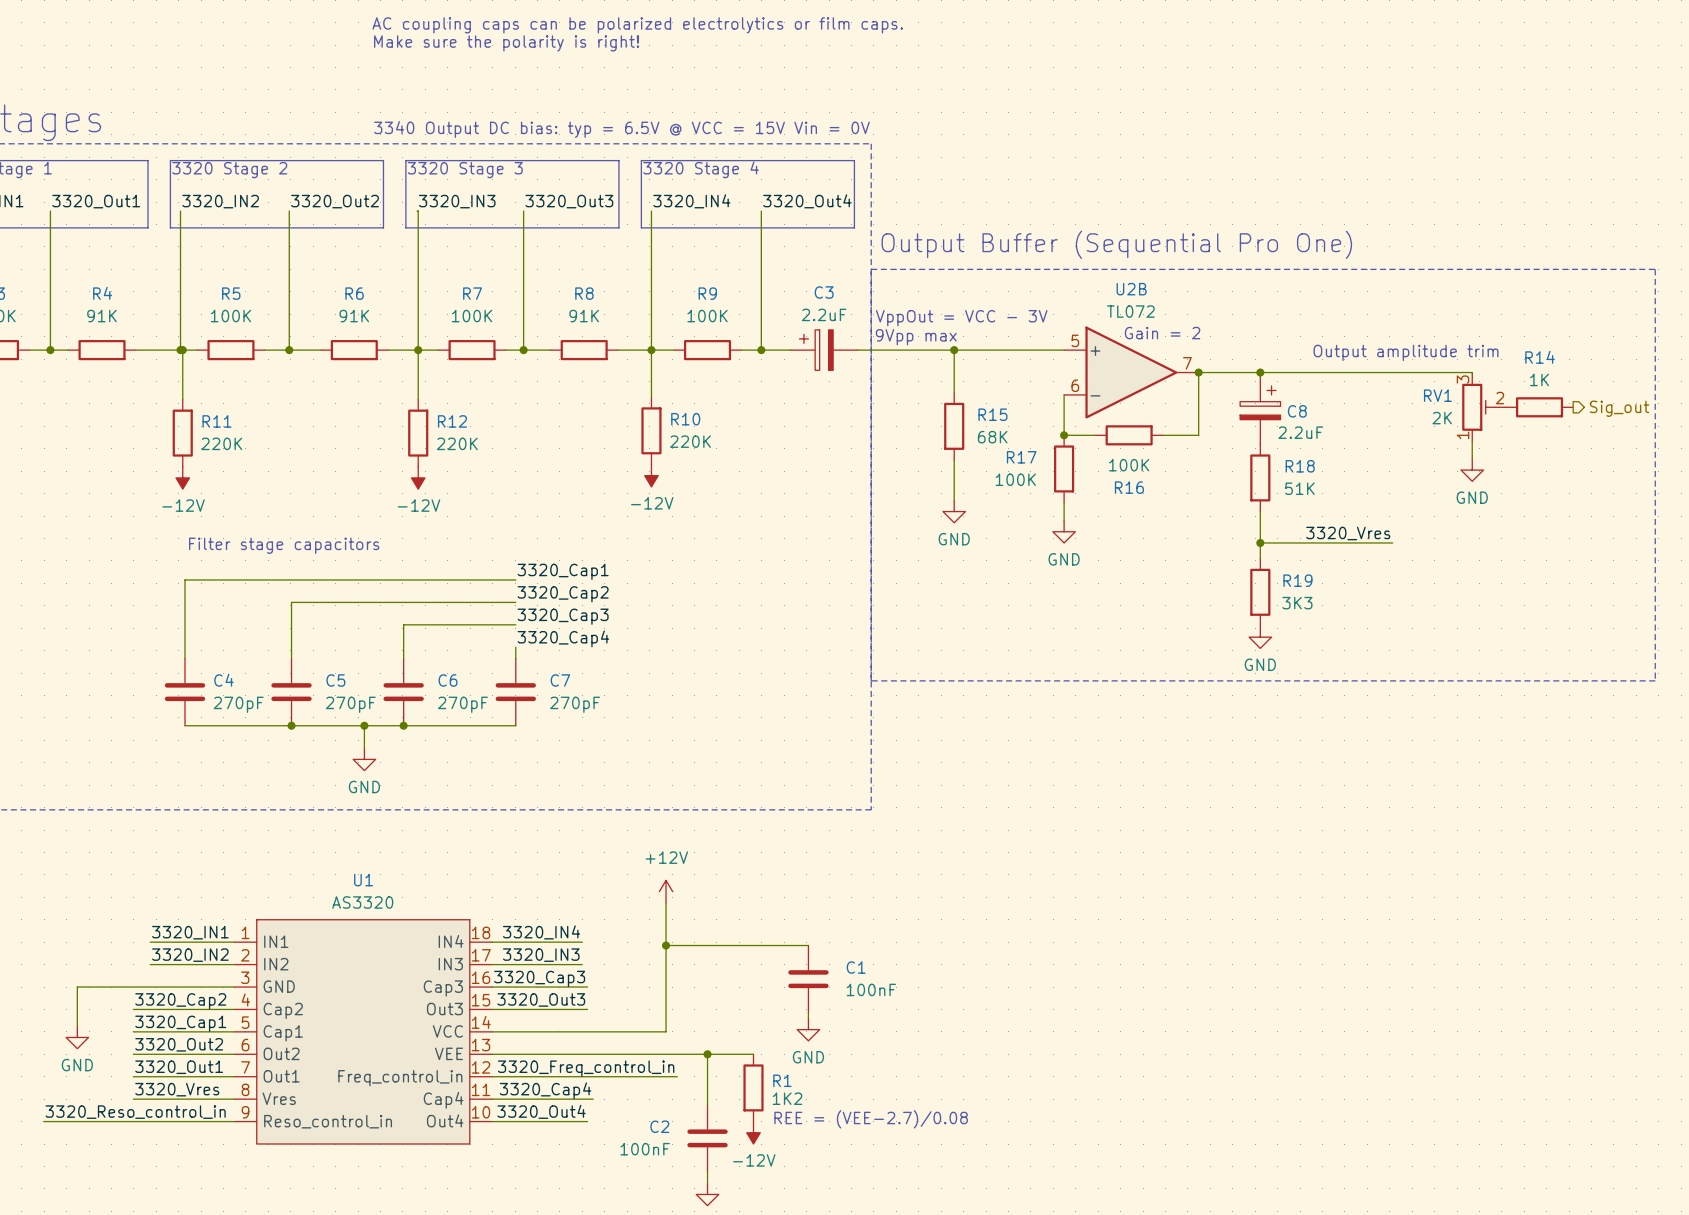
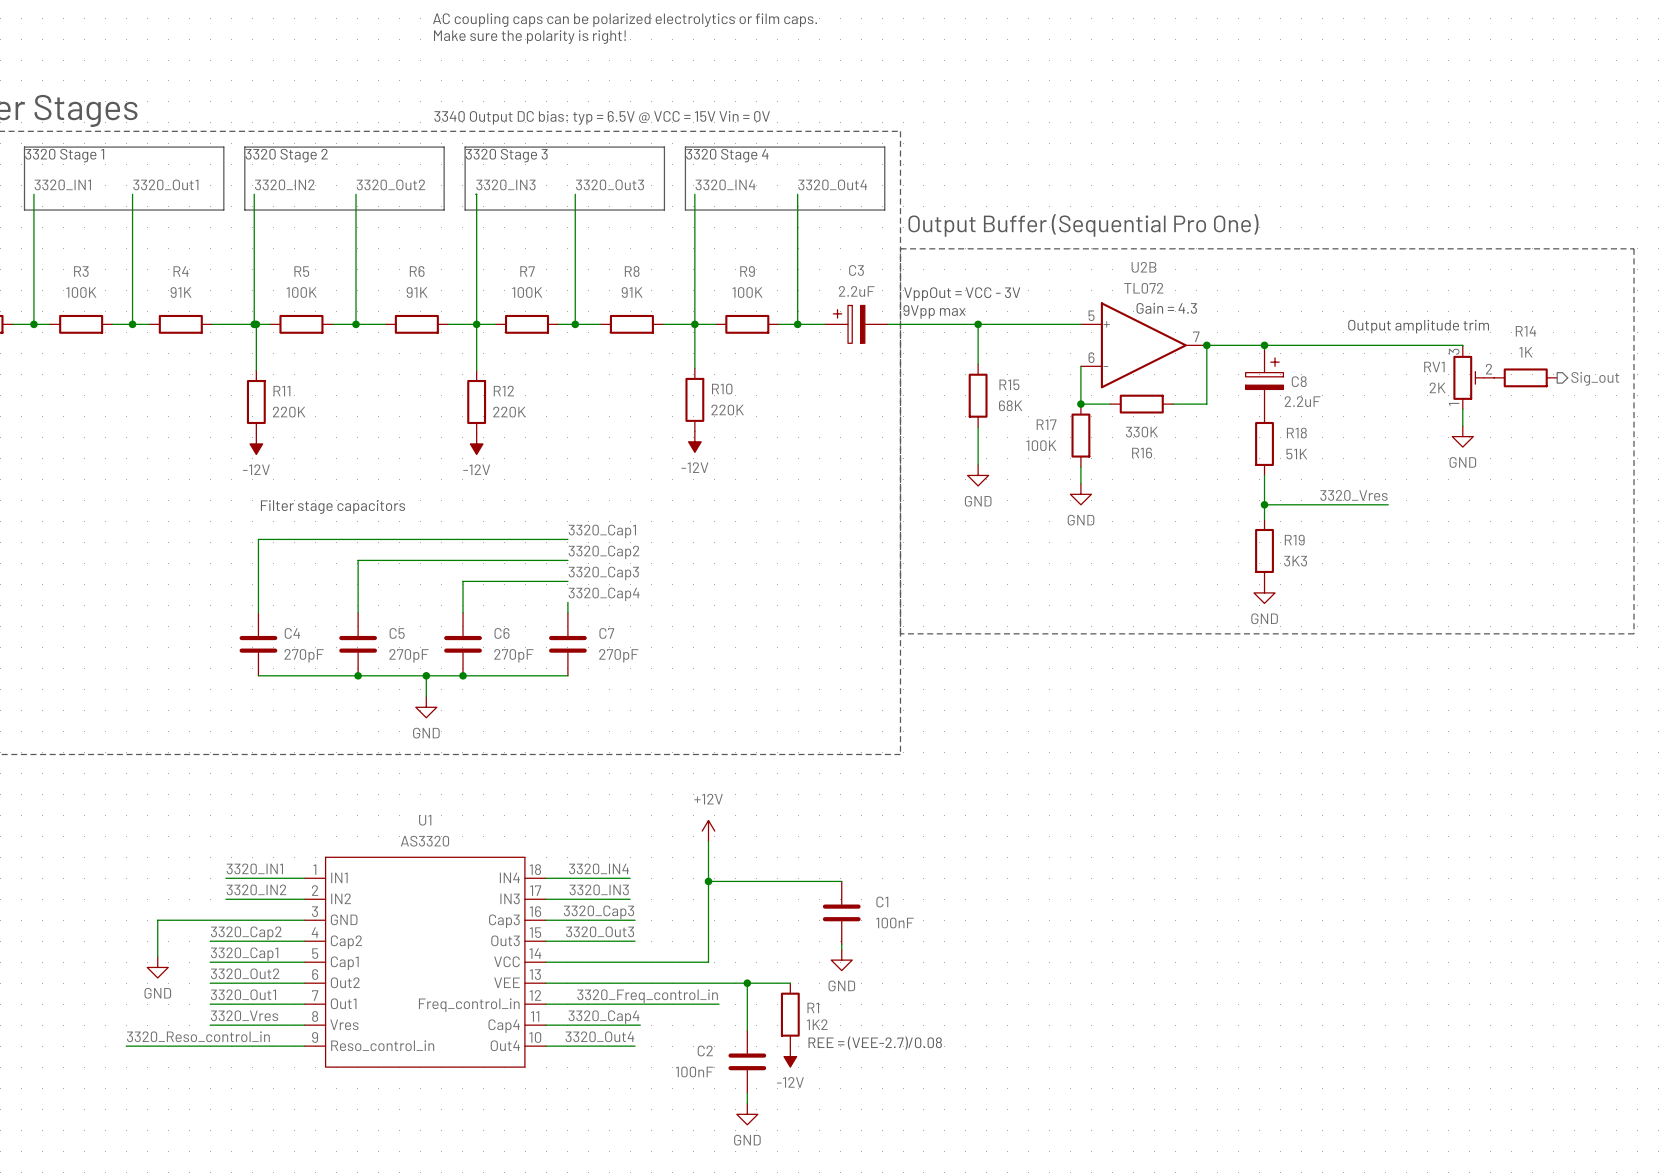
text: Gain = 2 (1162, 333) -> Gain = 4.3 (1166, 308)
R16 value: 100K (1129, 465) -> 330K (1141, 432)

